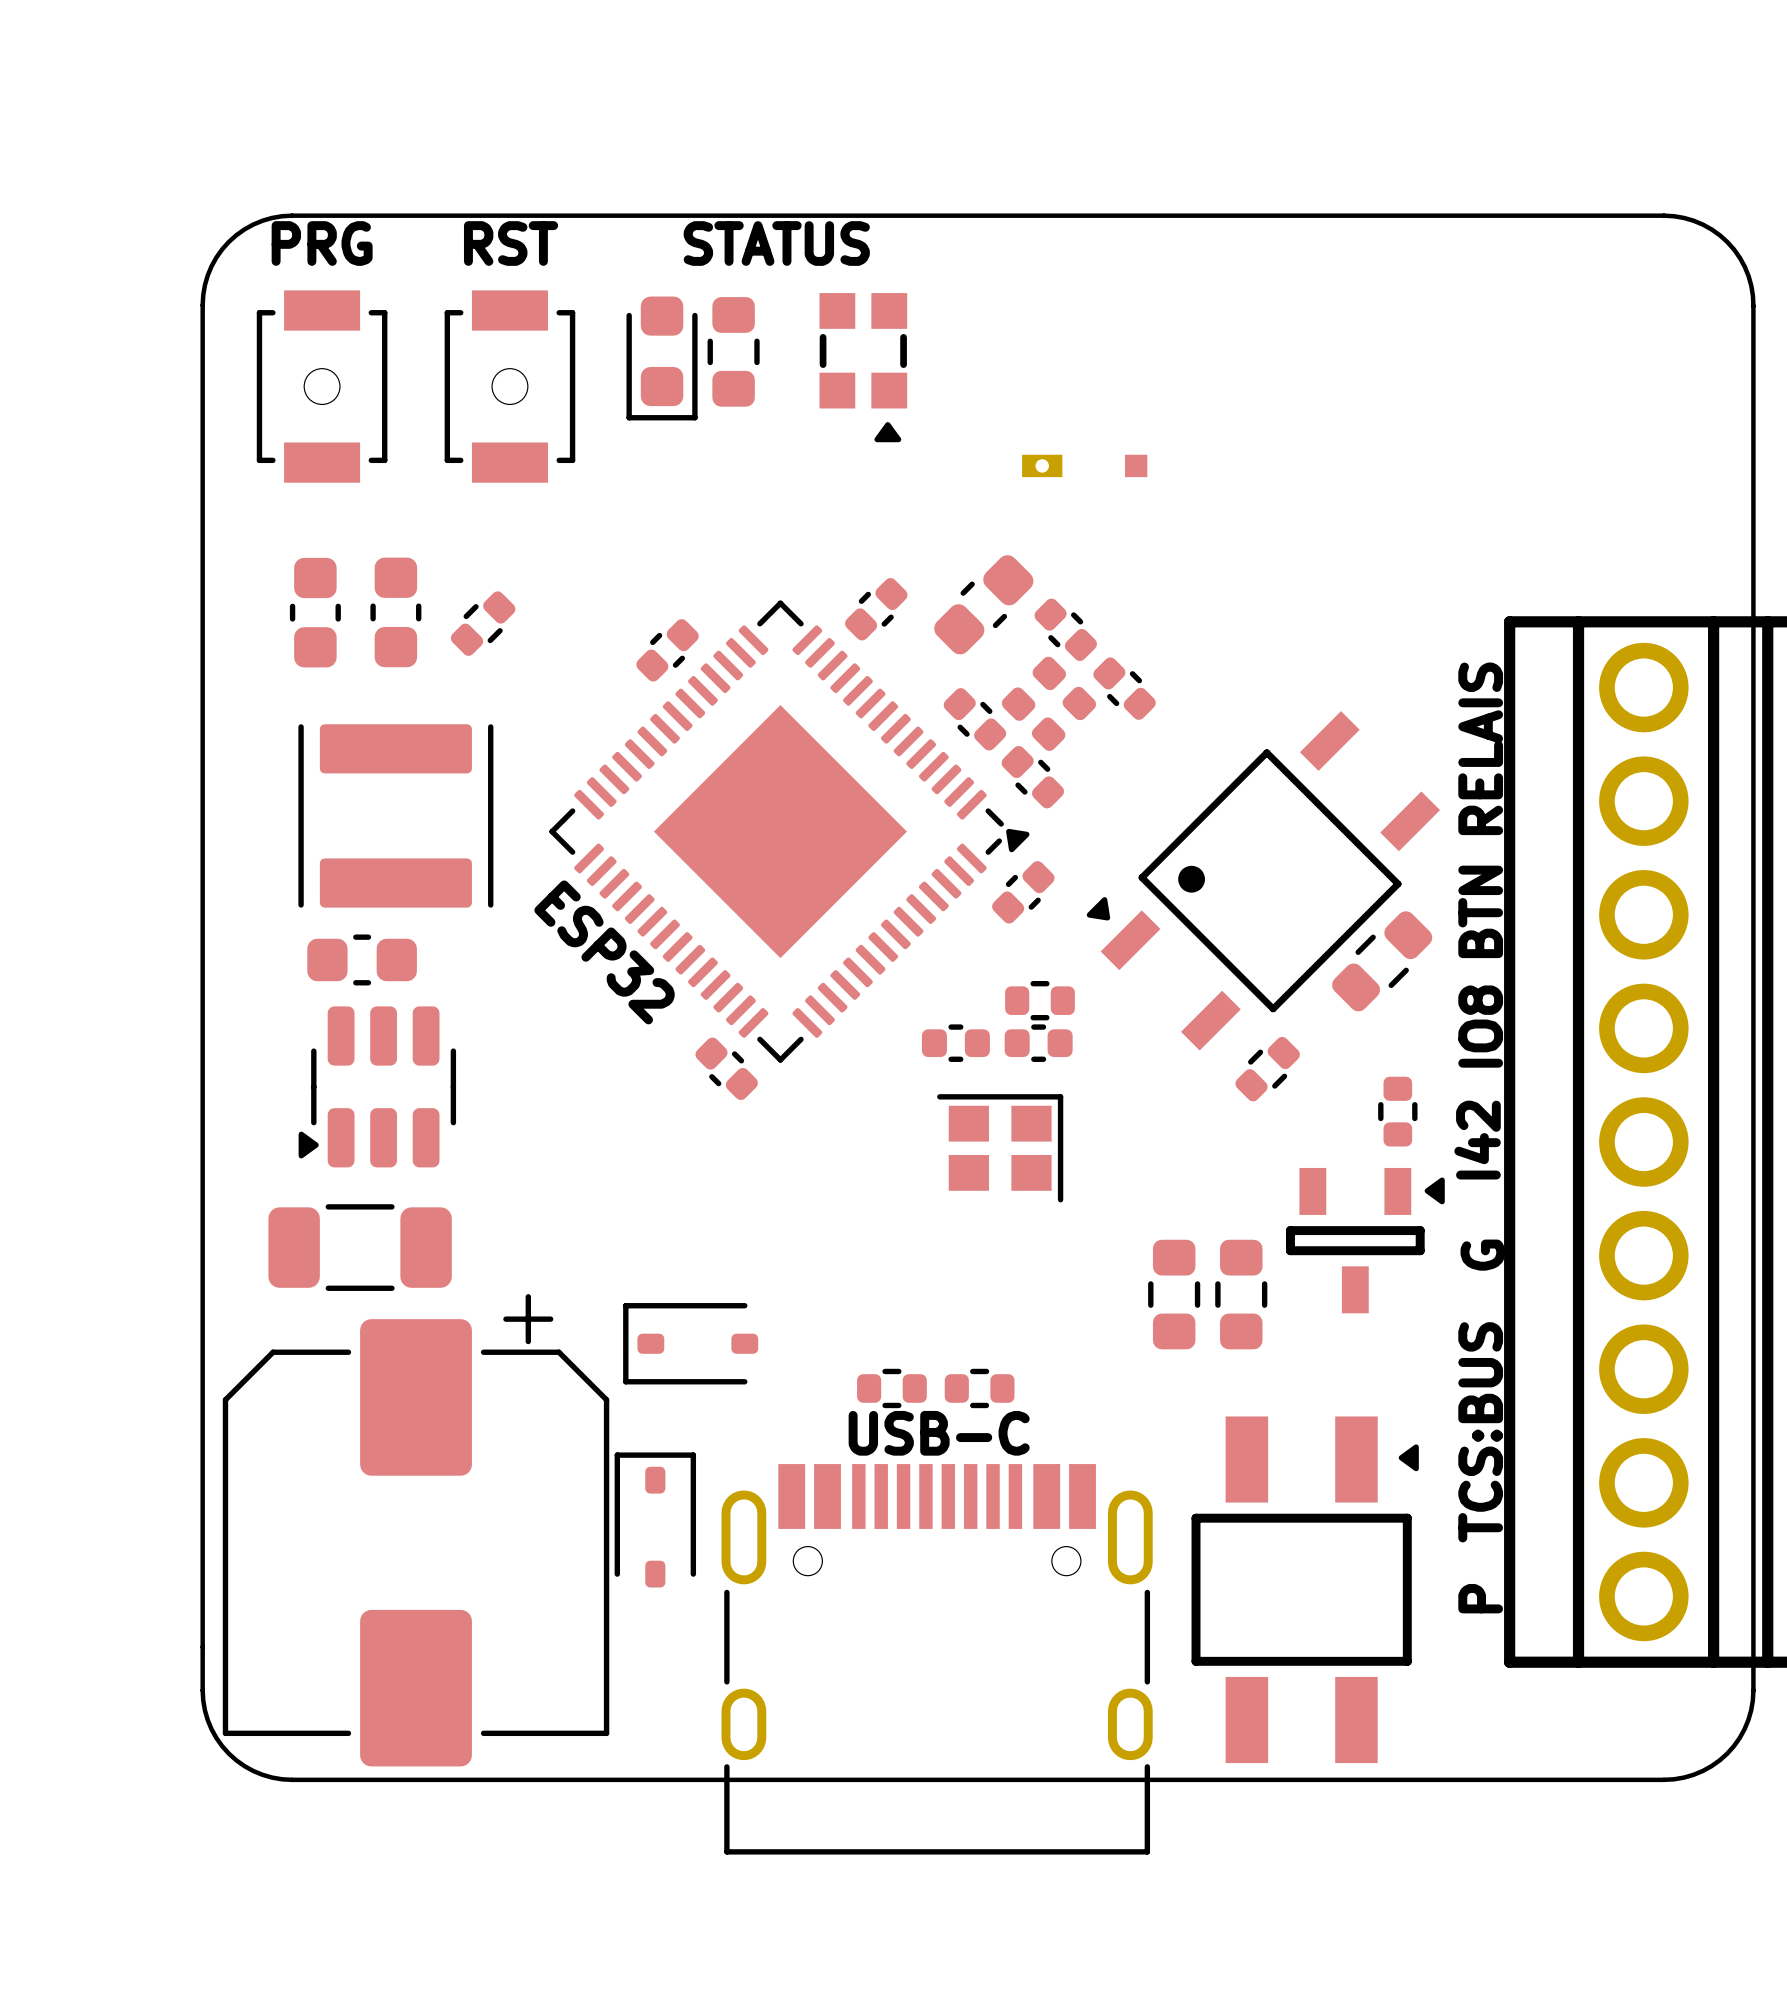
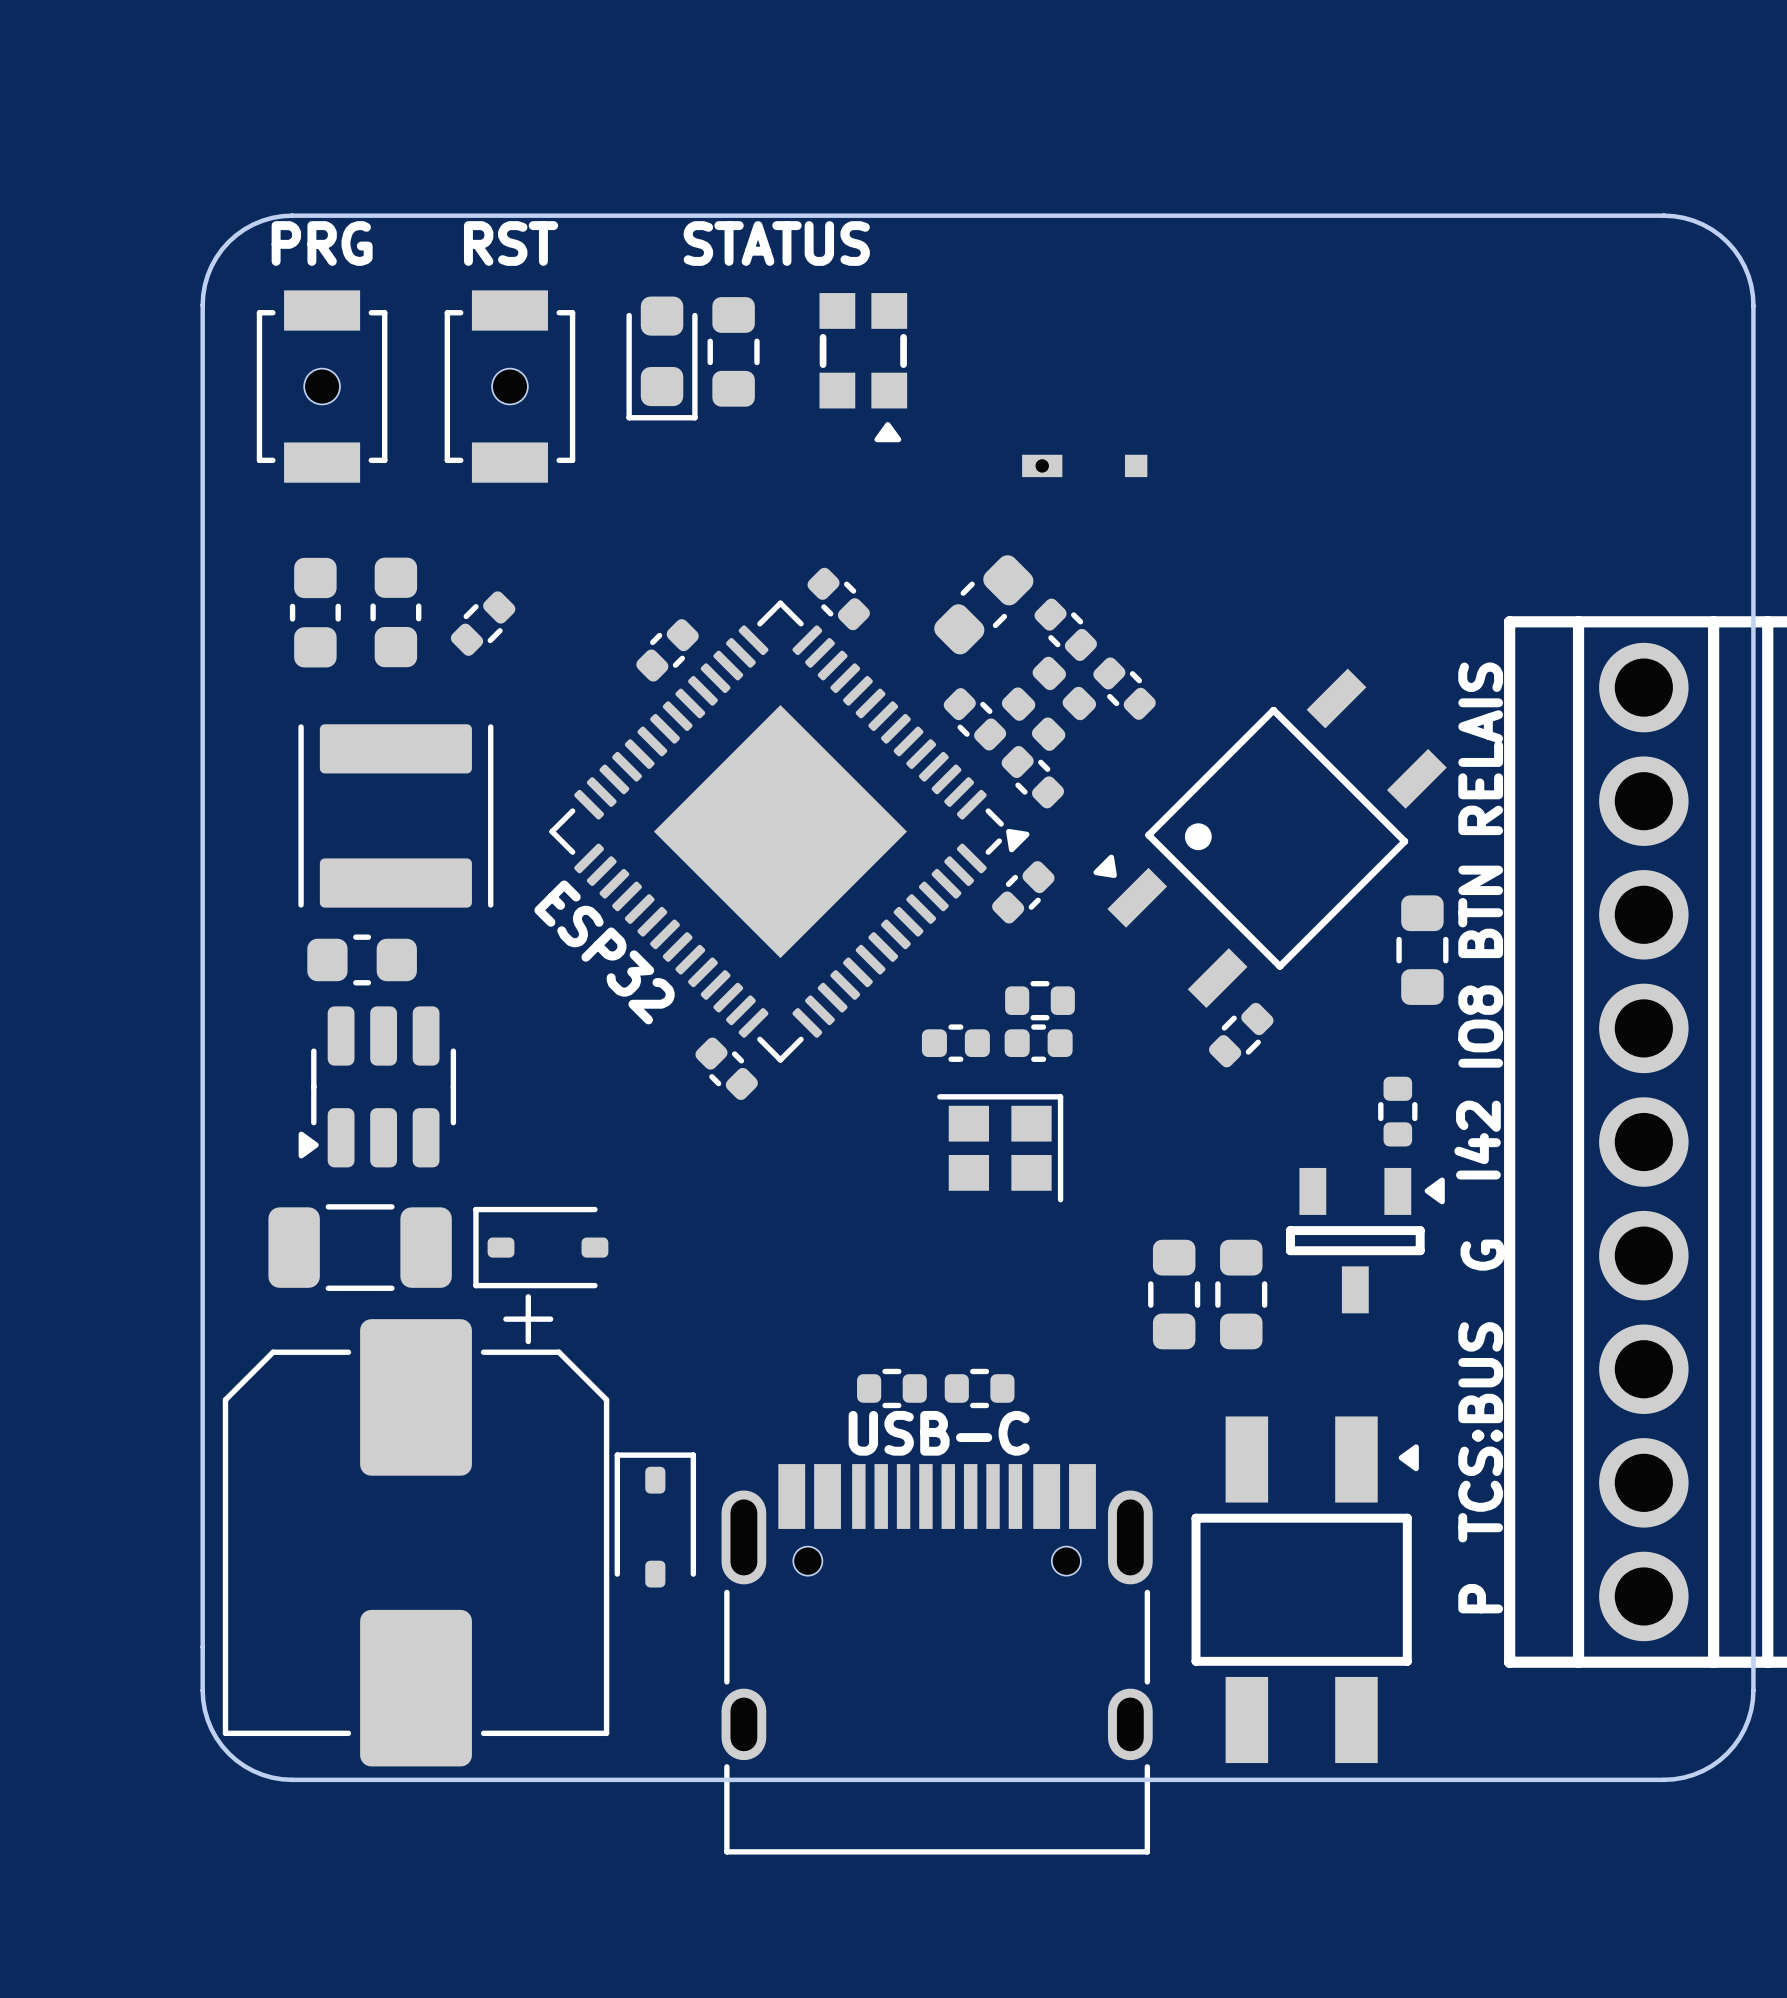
part rotation: 0° (876, 609) -> 90° clockwise (838, 599)
part position: (876, 609) -> (838, 599)
part position: (1263, 880) -> (1270, 838)
part rotation: 0° (1382, 961) -> 45° counterclockwise (1422, 950)
part position: (1267, 1069) -> (1241, 1035)
part position: (690, 1343) -> (540, 1247)

